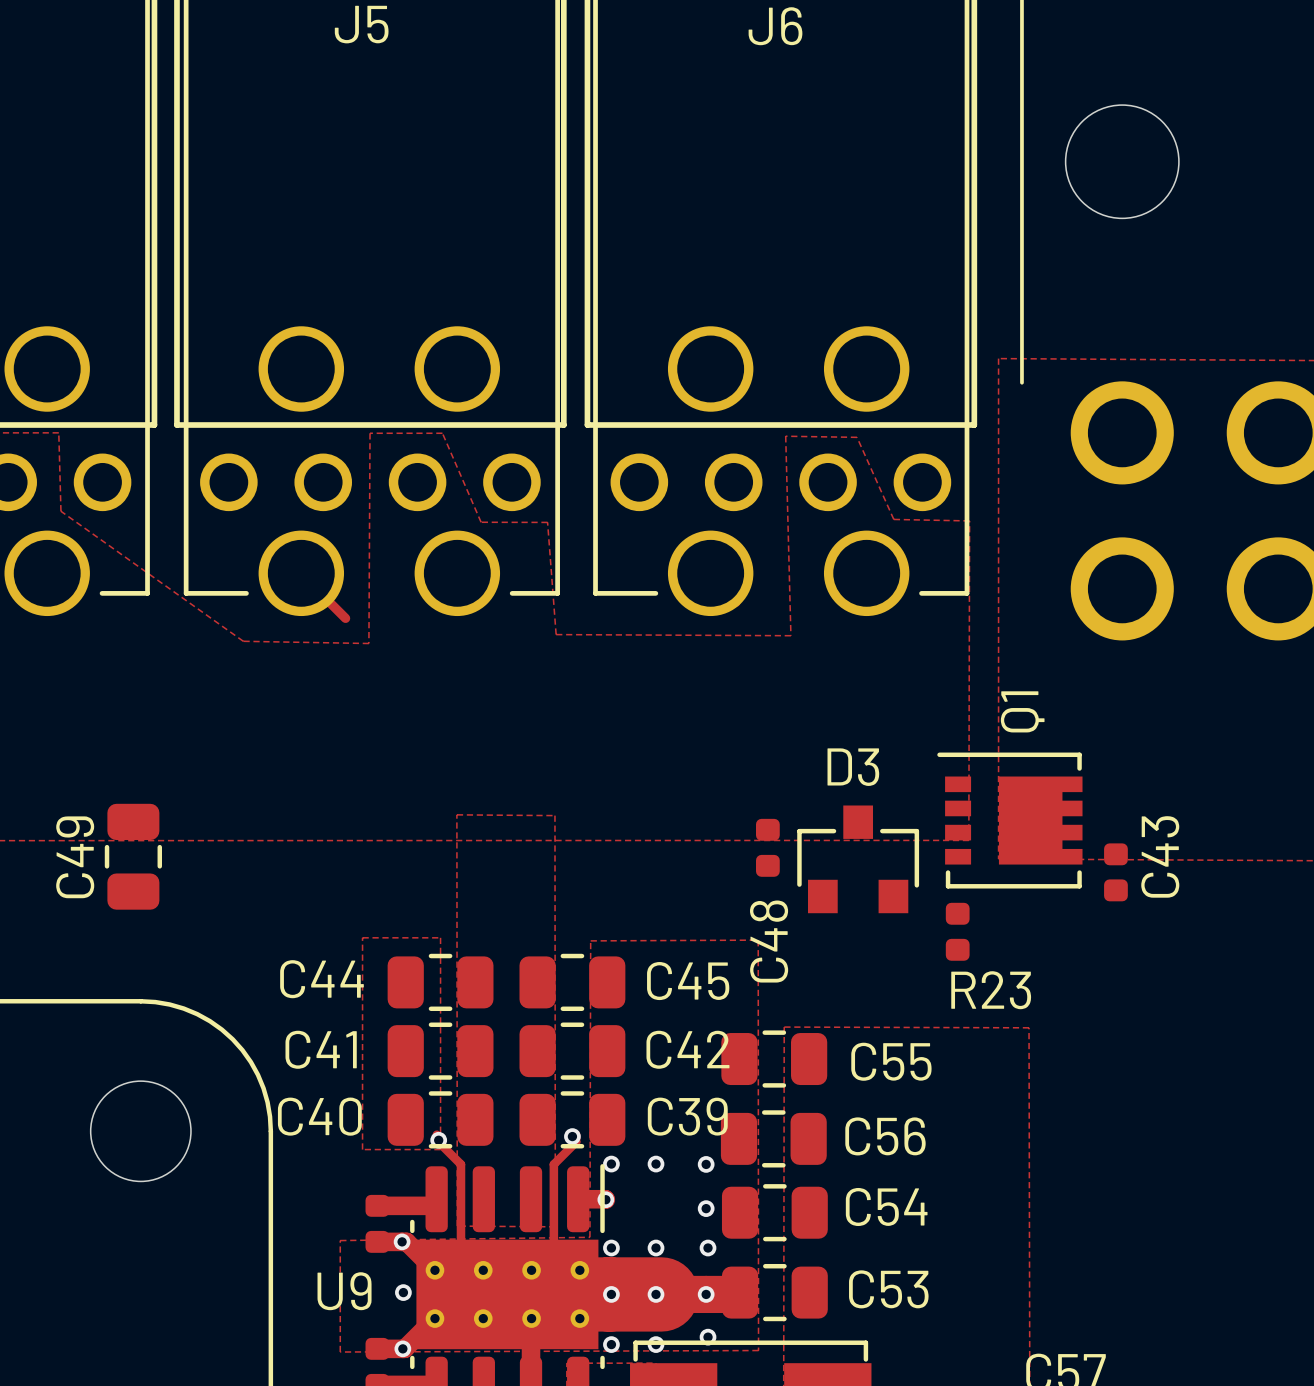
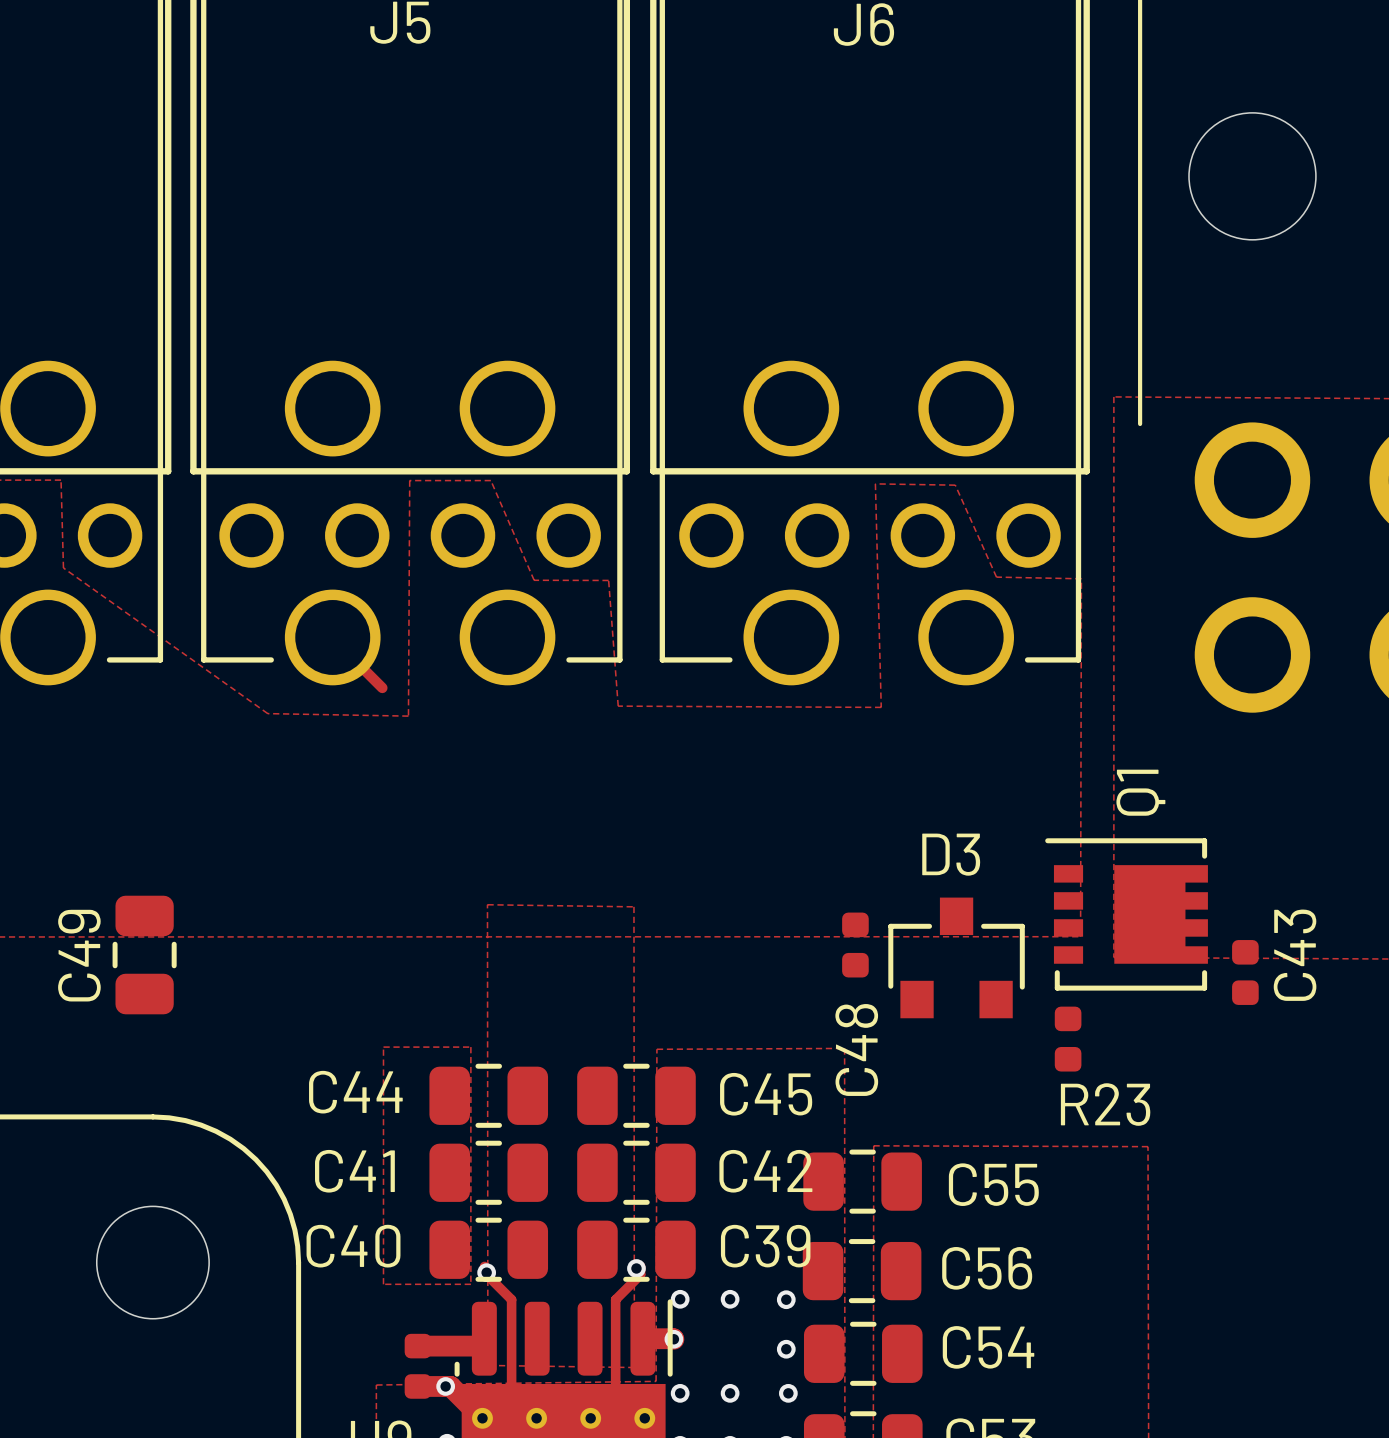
zone outline: (456, 814) (554, 815) (555, 1226) (457, 1226) (456, 814) -> (487, 904) (487, 1365) (634, 1367) (633, 906) (487, 904)
zone outline: (362, 937) (440, 937) (440, 1149) (362, 1149) (362, 937) -> (383, 1047) (470, 1047) (470, 1284) (383, 1284) (383, 1047)

